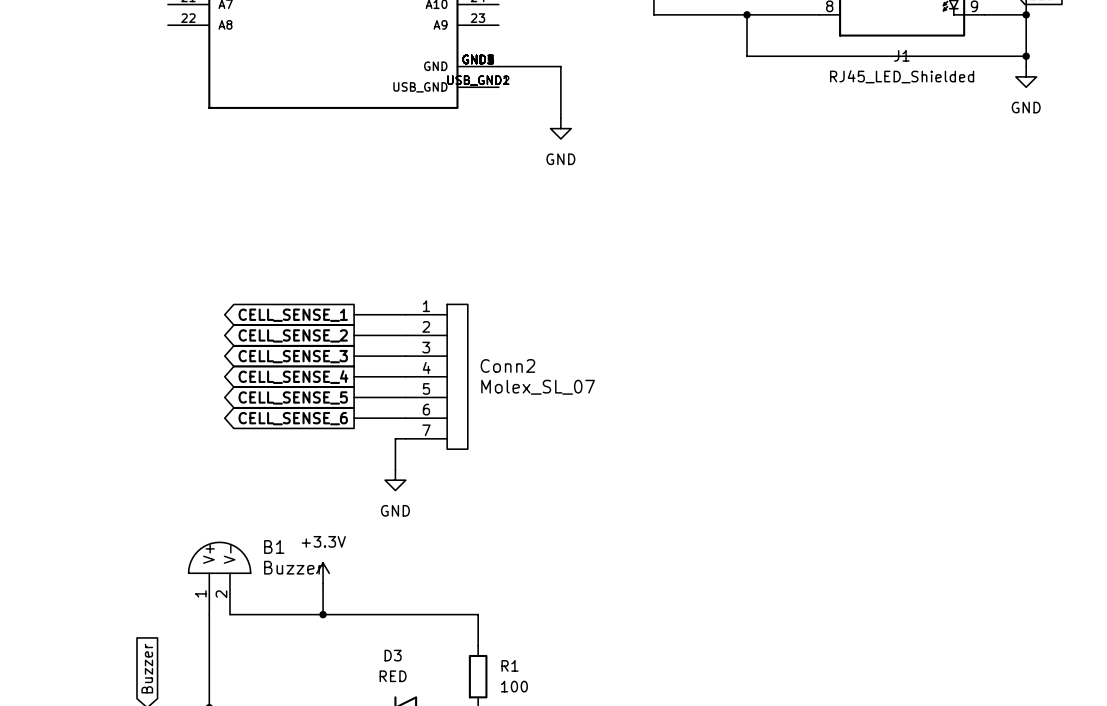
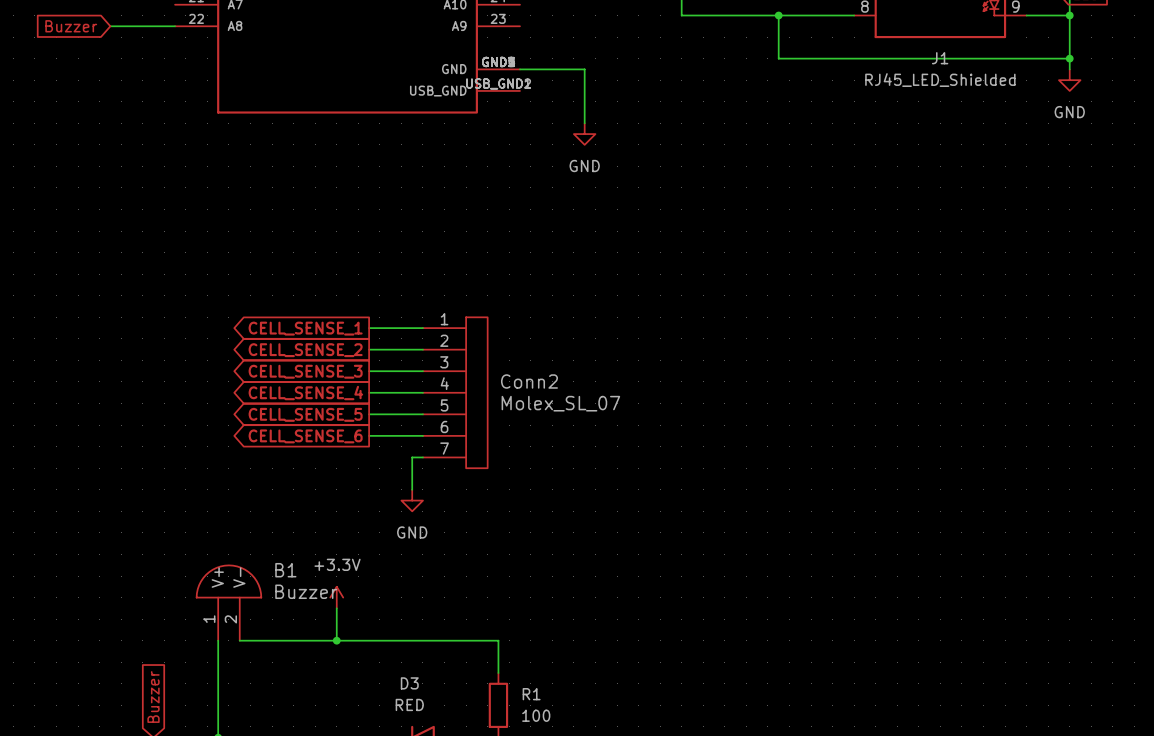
global label: none -> Buzzer (71, 26)
wire: none -> (110, 26) (175, 26)

